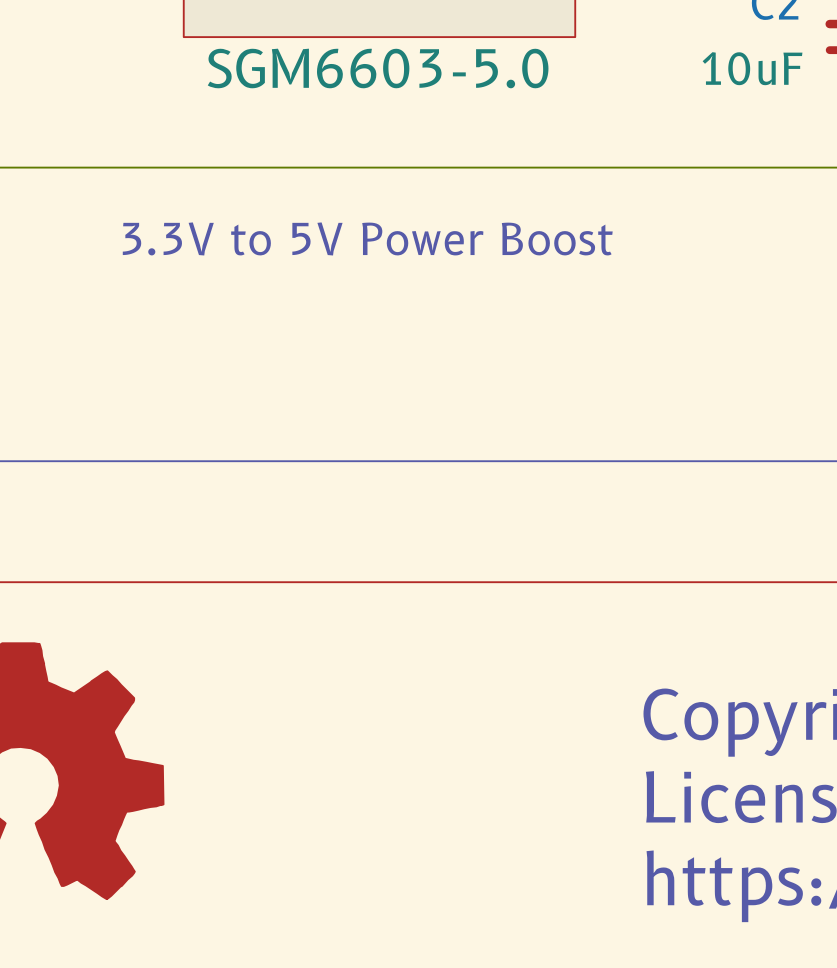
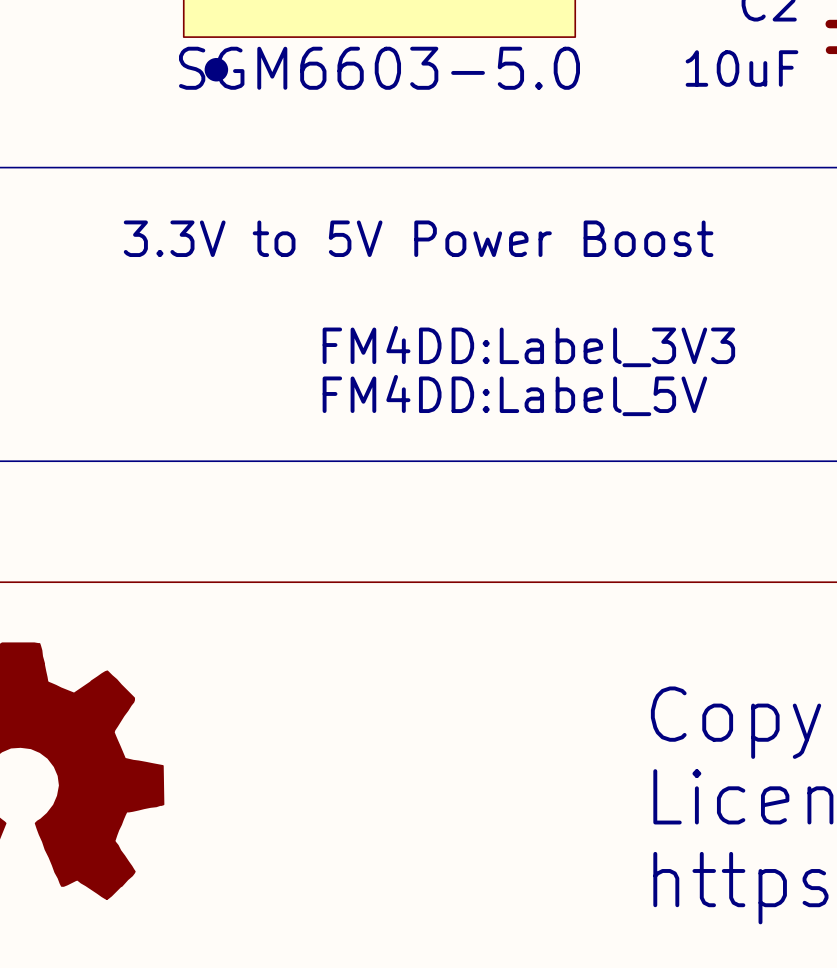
junction: none -> (216, 69)
part: none -> (528, 346)
part: none -> (514, 395)

